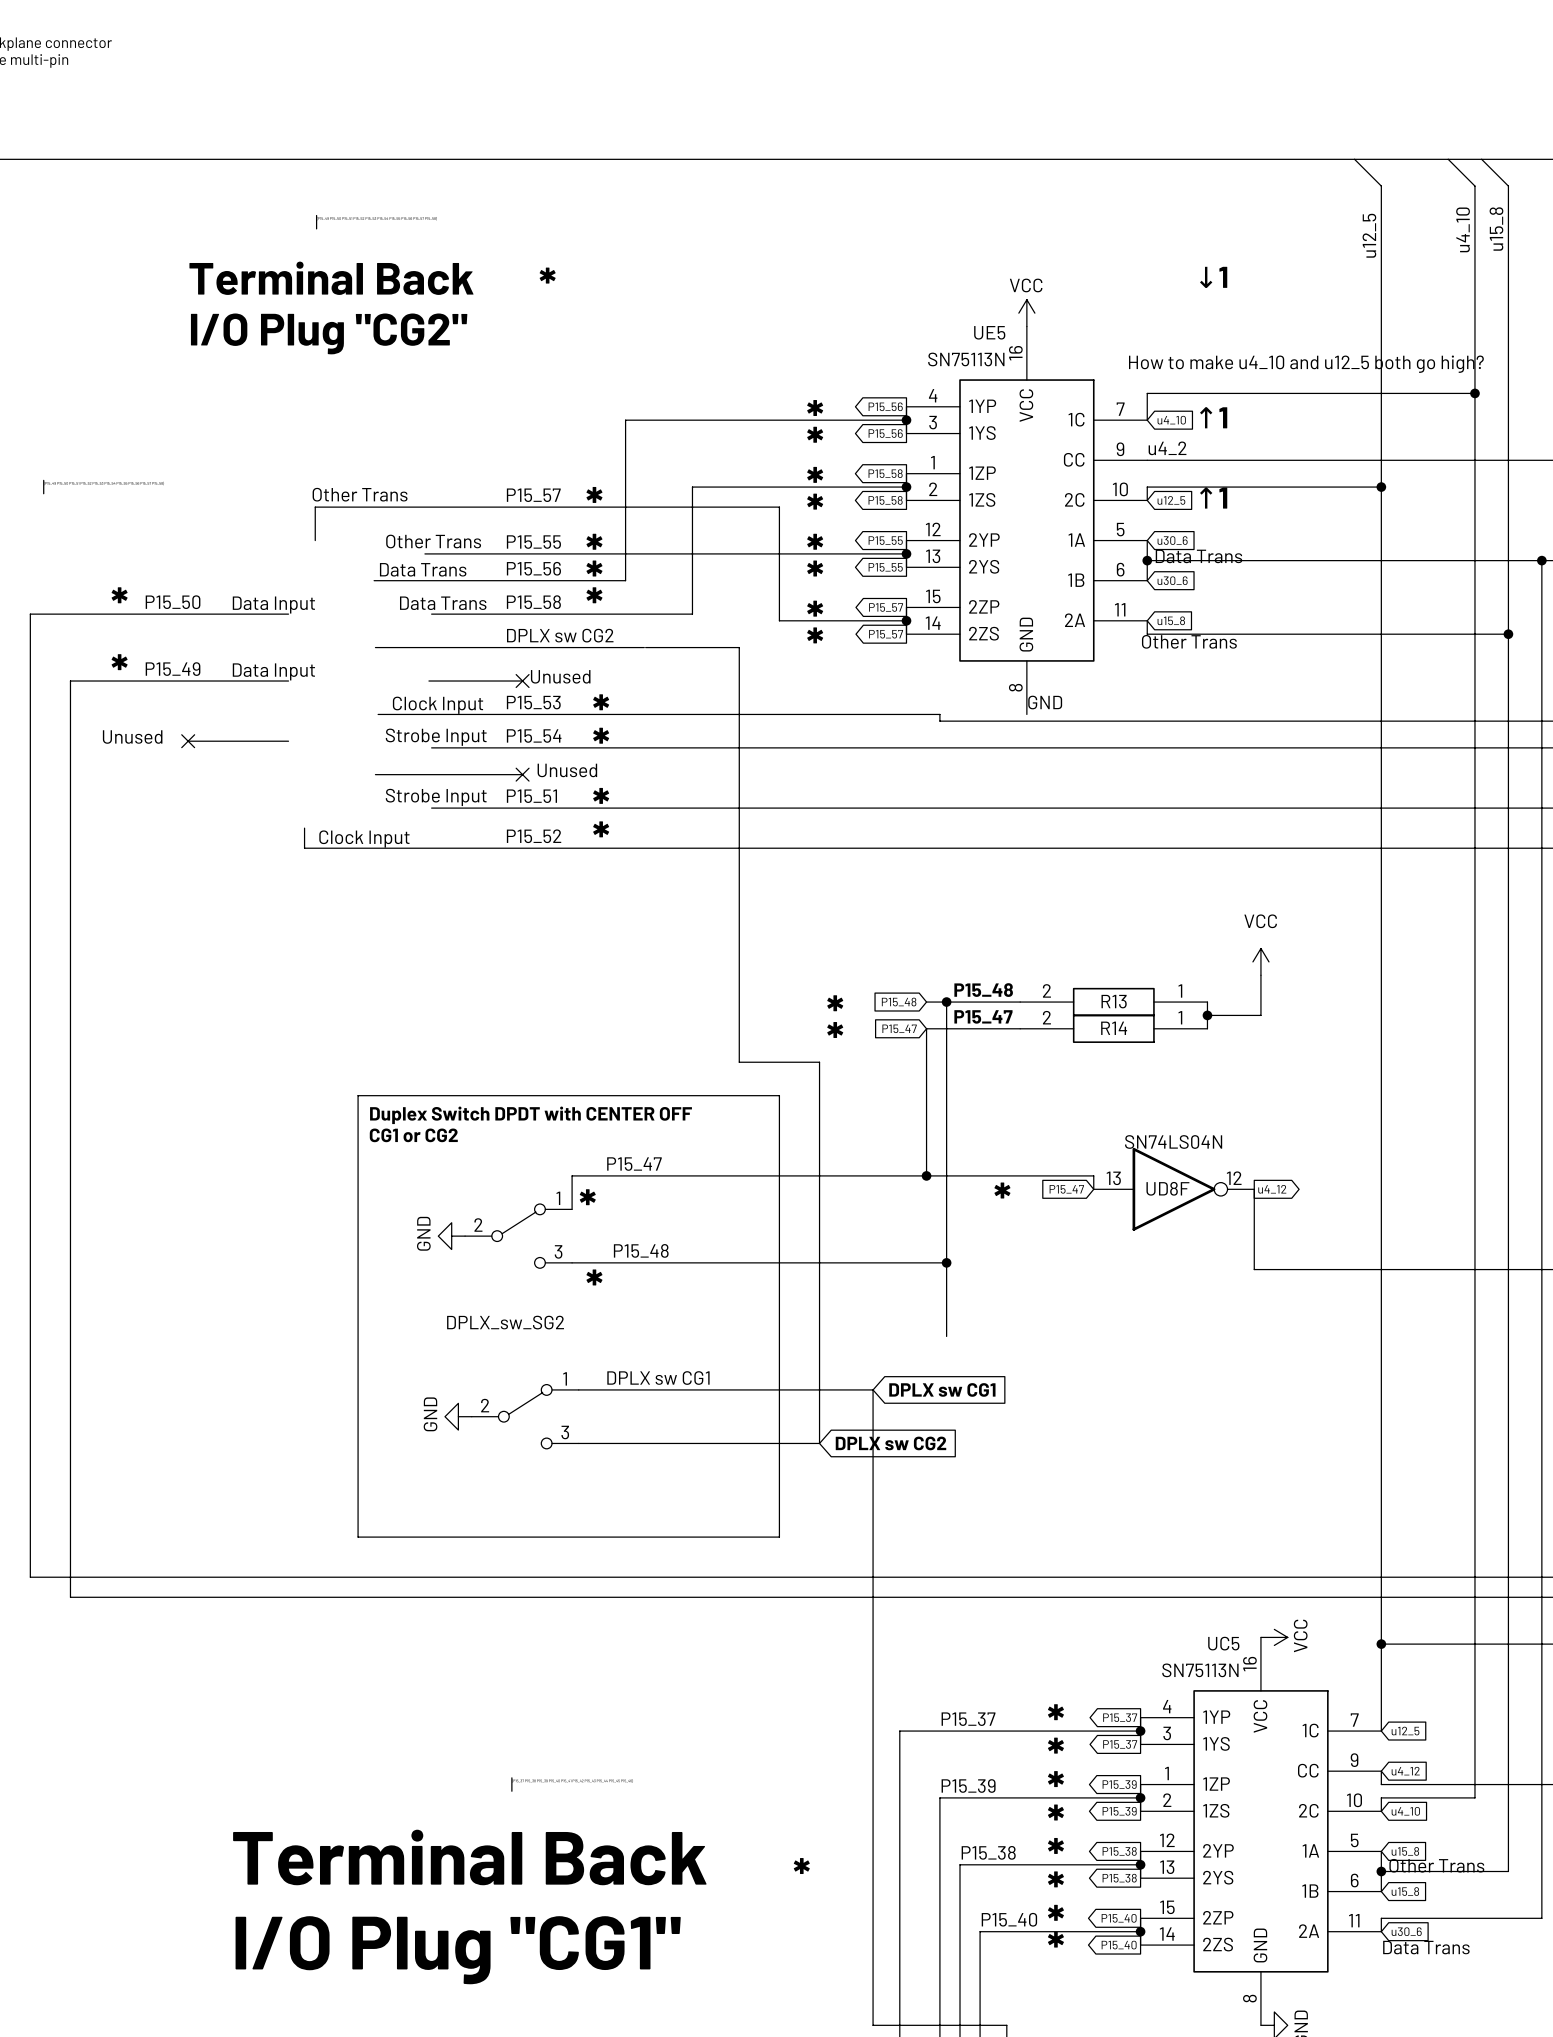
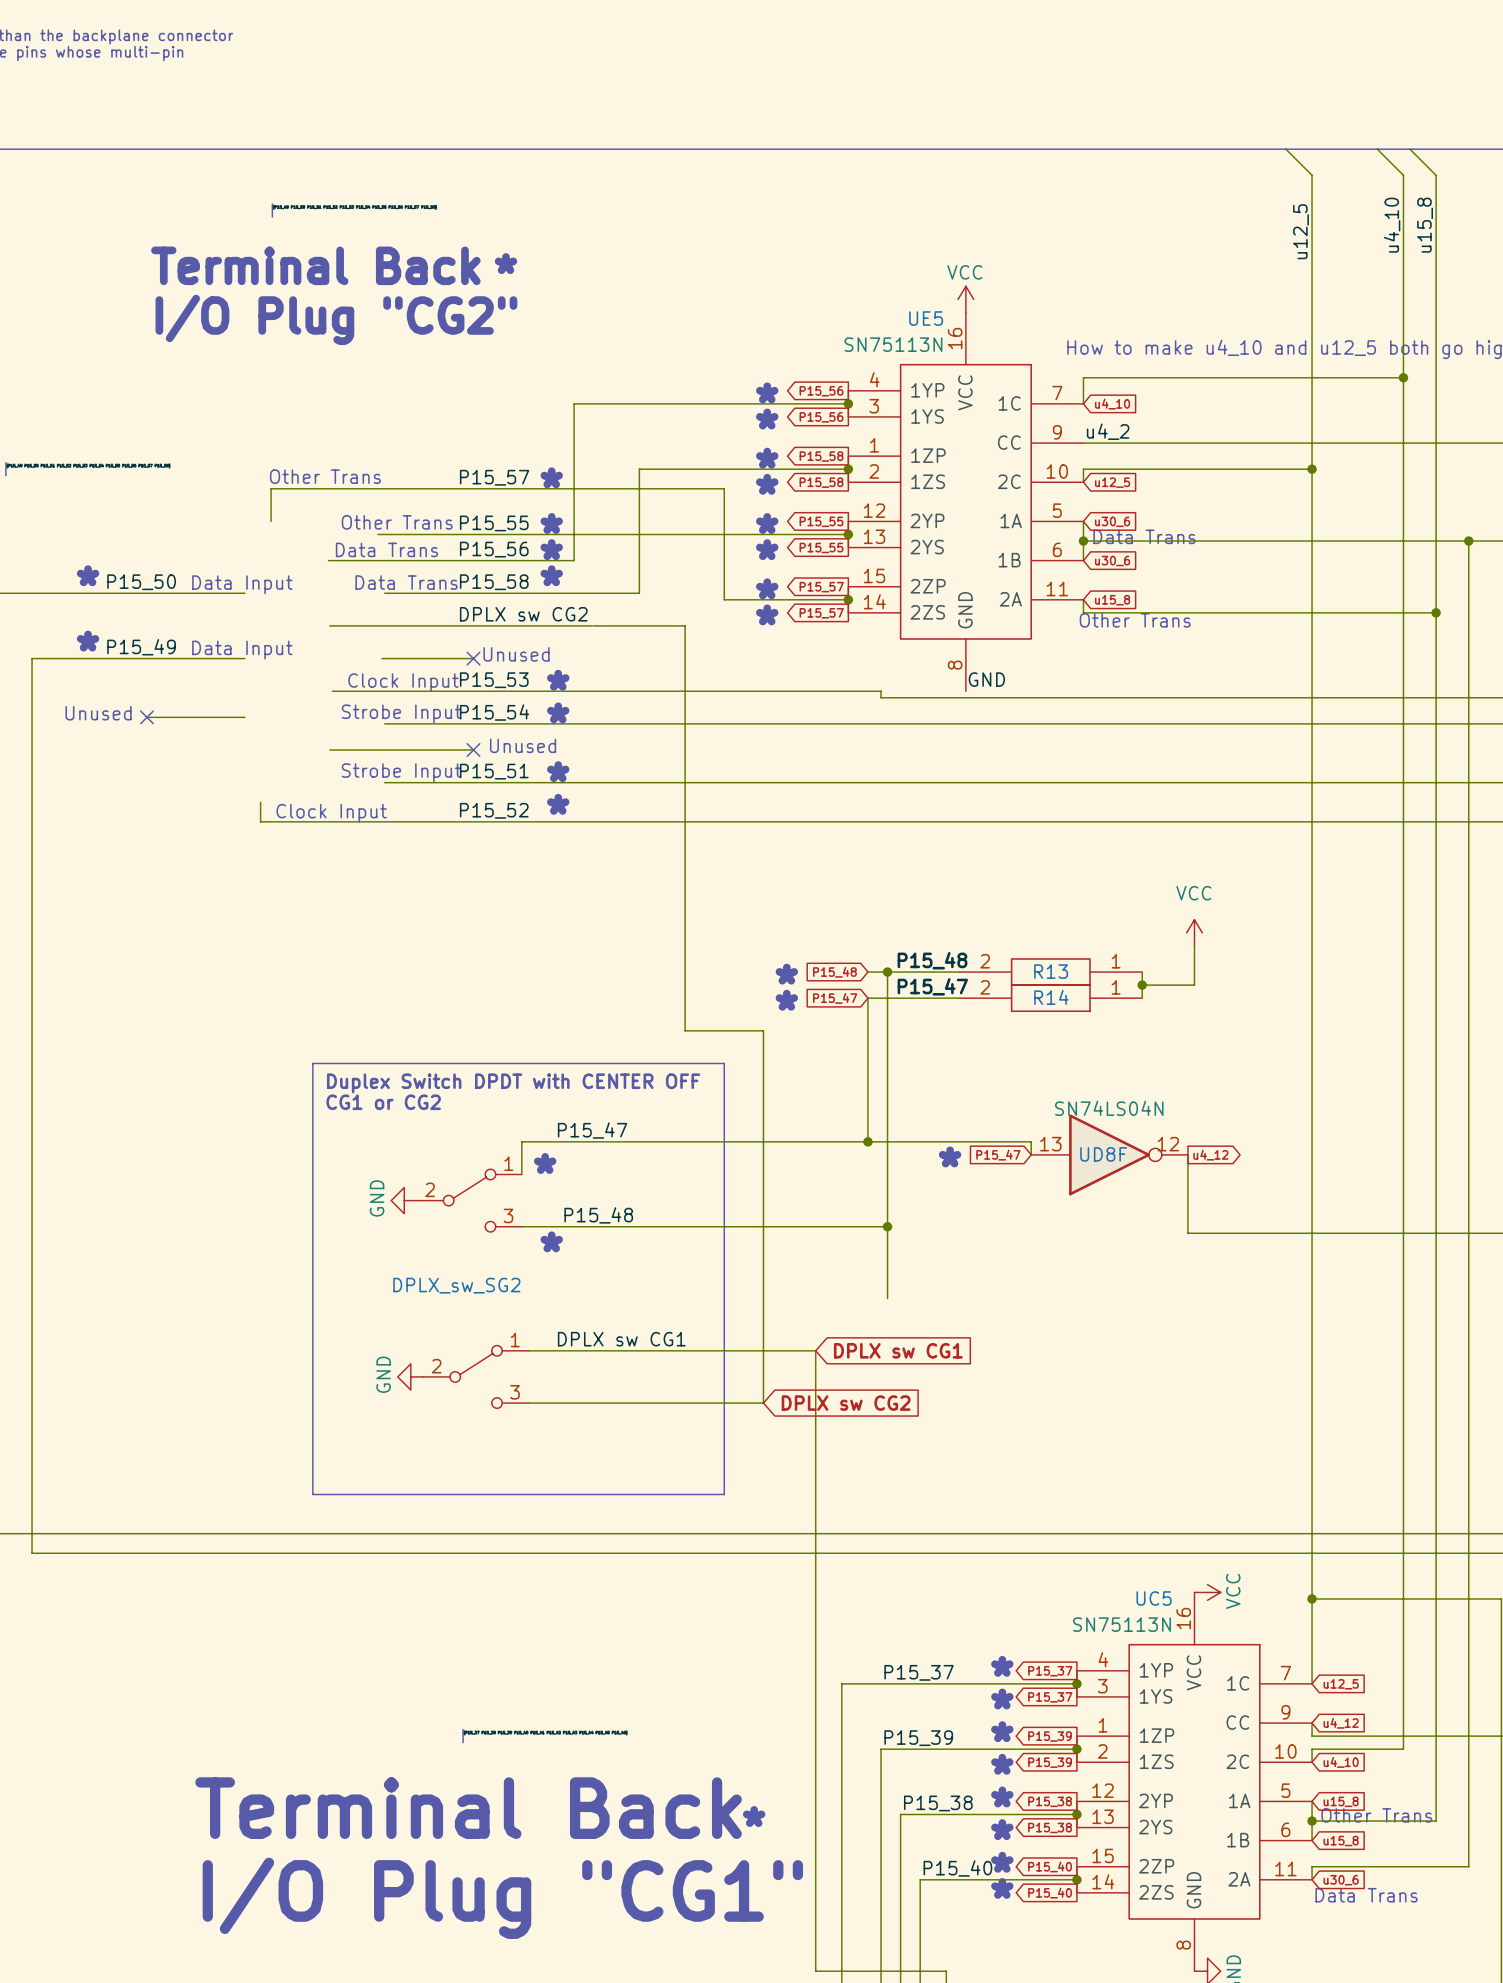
text: ↓1 (1213, 277) -> none
text: ↑1 (1213, 417) -> none
text: ↑1 (1213, 498) -> none

